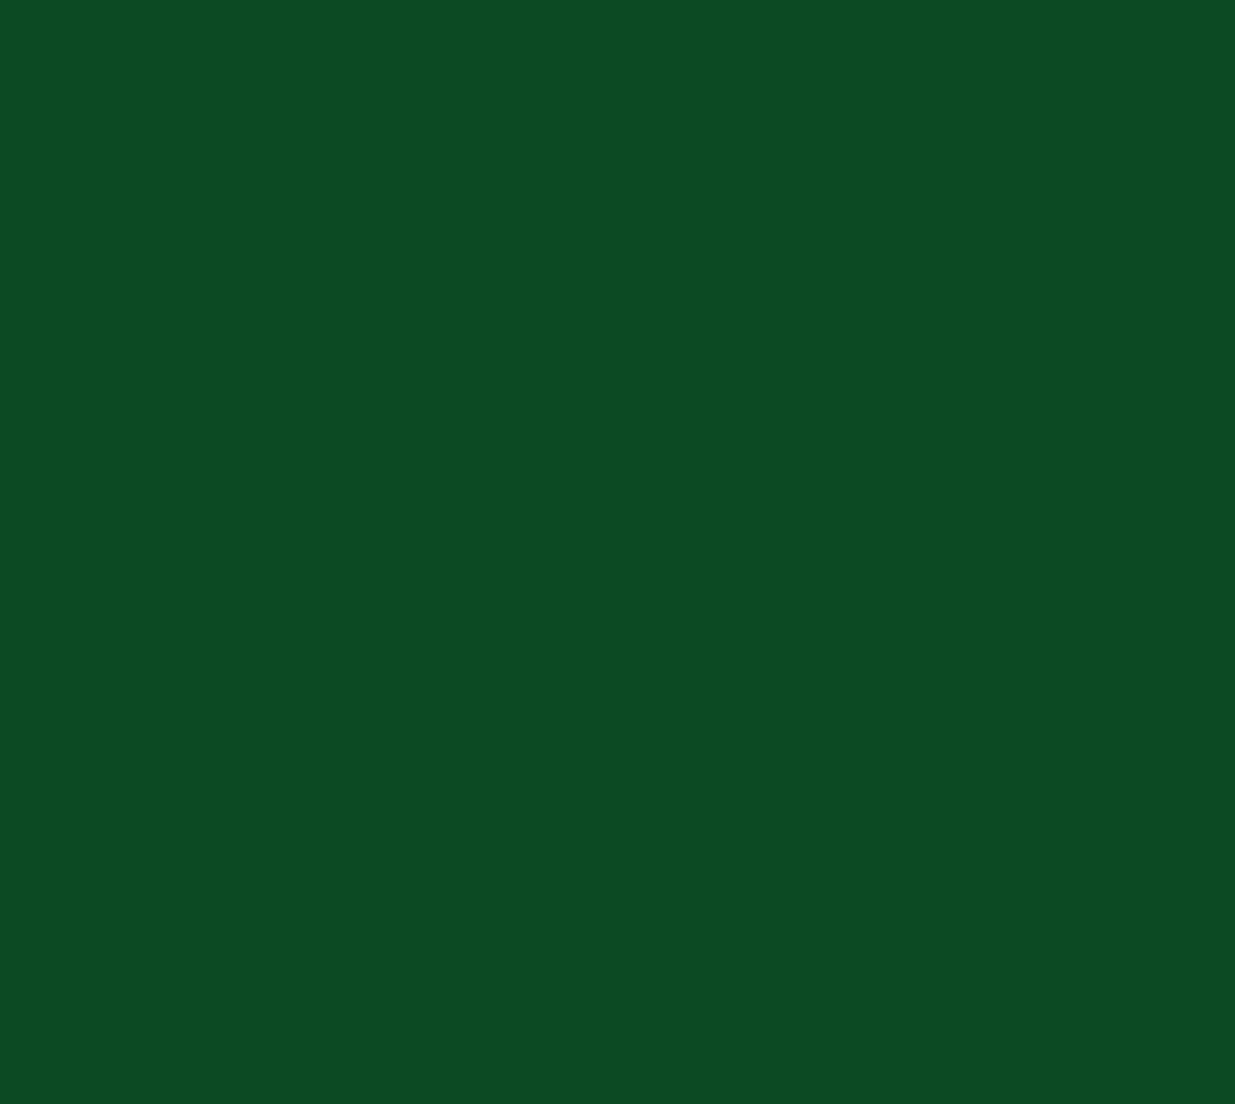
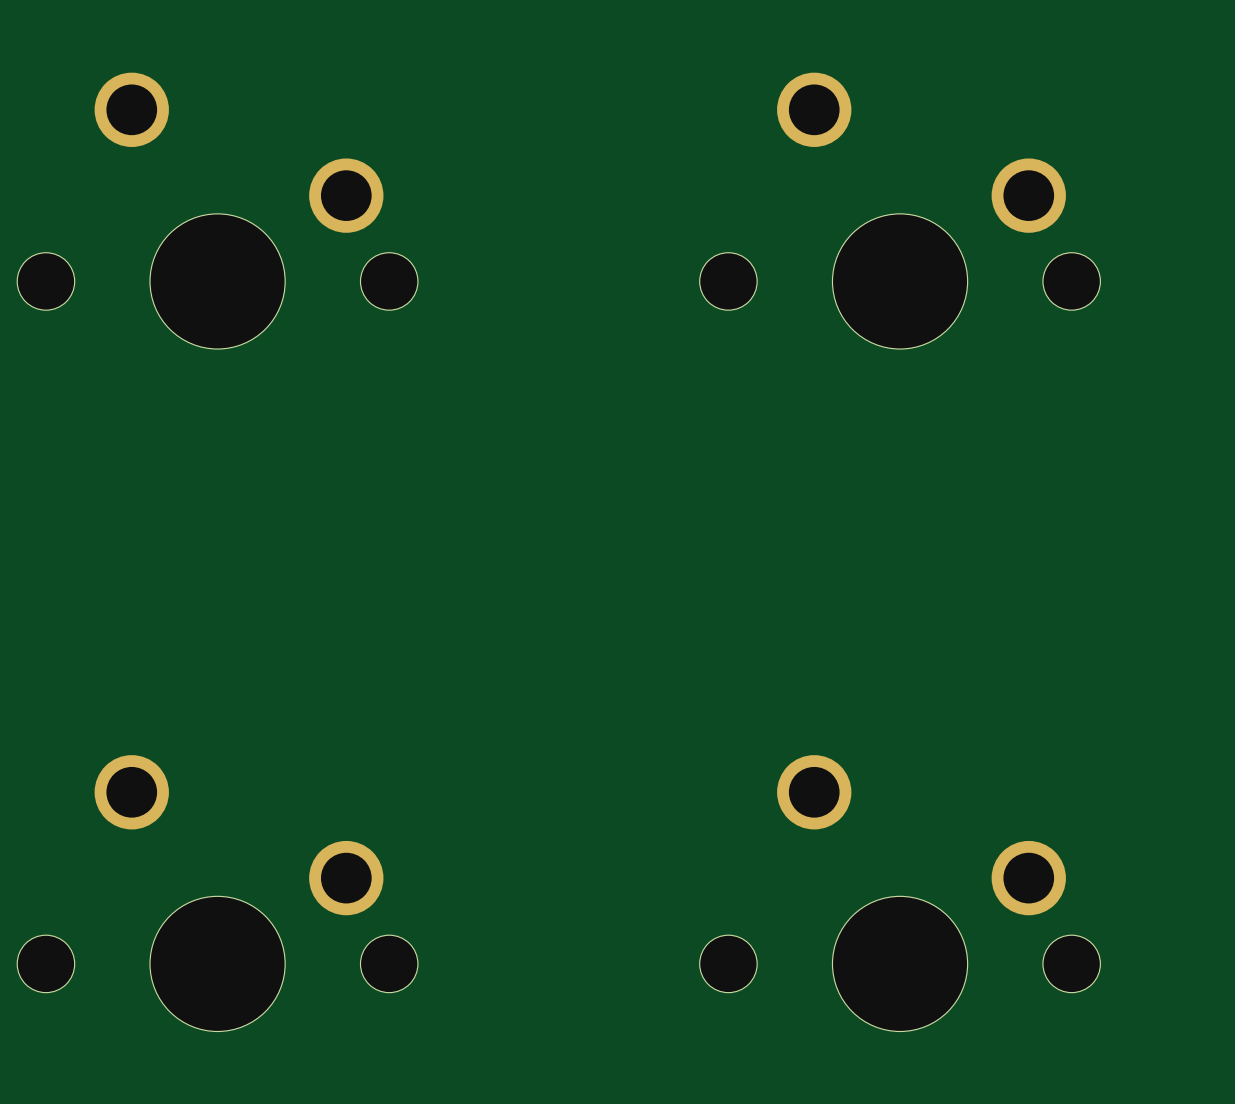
part: none -> (217, 210)
part: none -> (900, 210)
part: none -> (217, 893)
part: none -> (900, 893)

